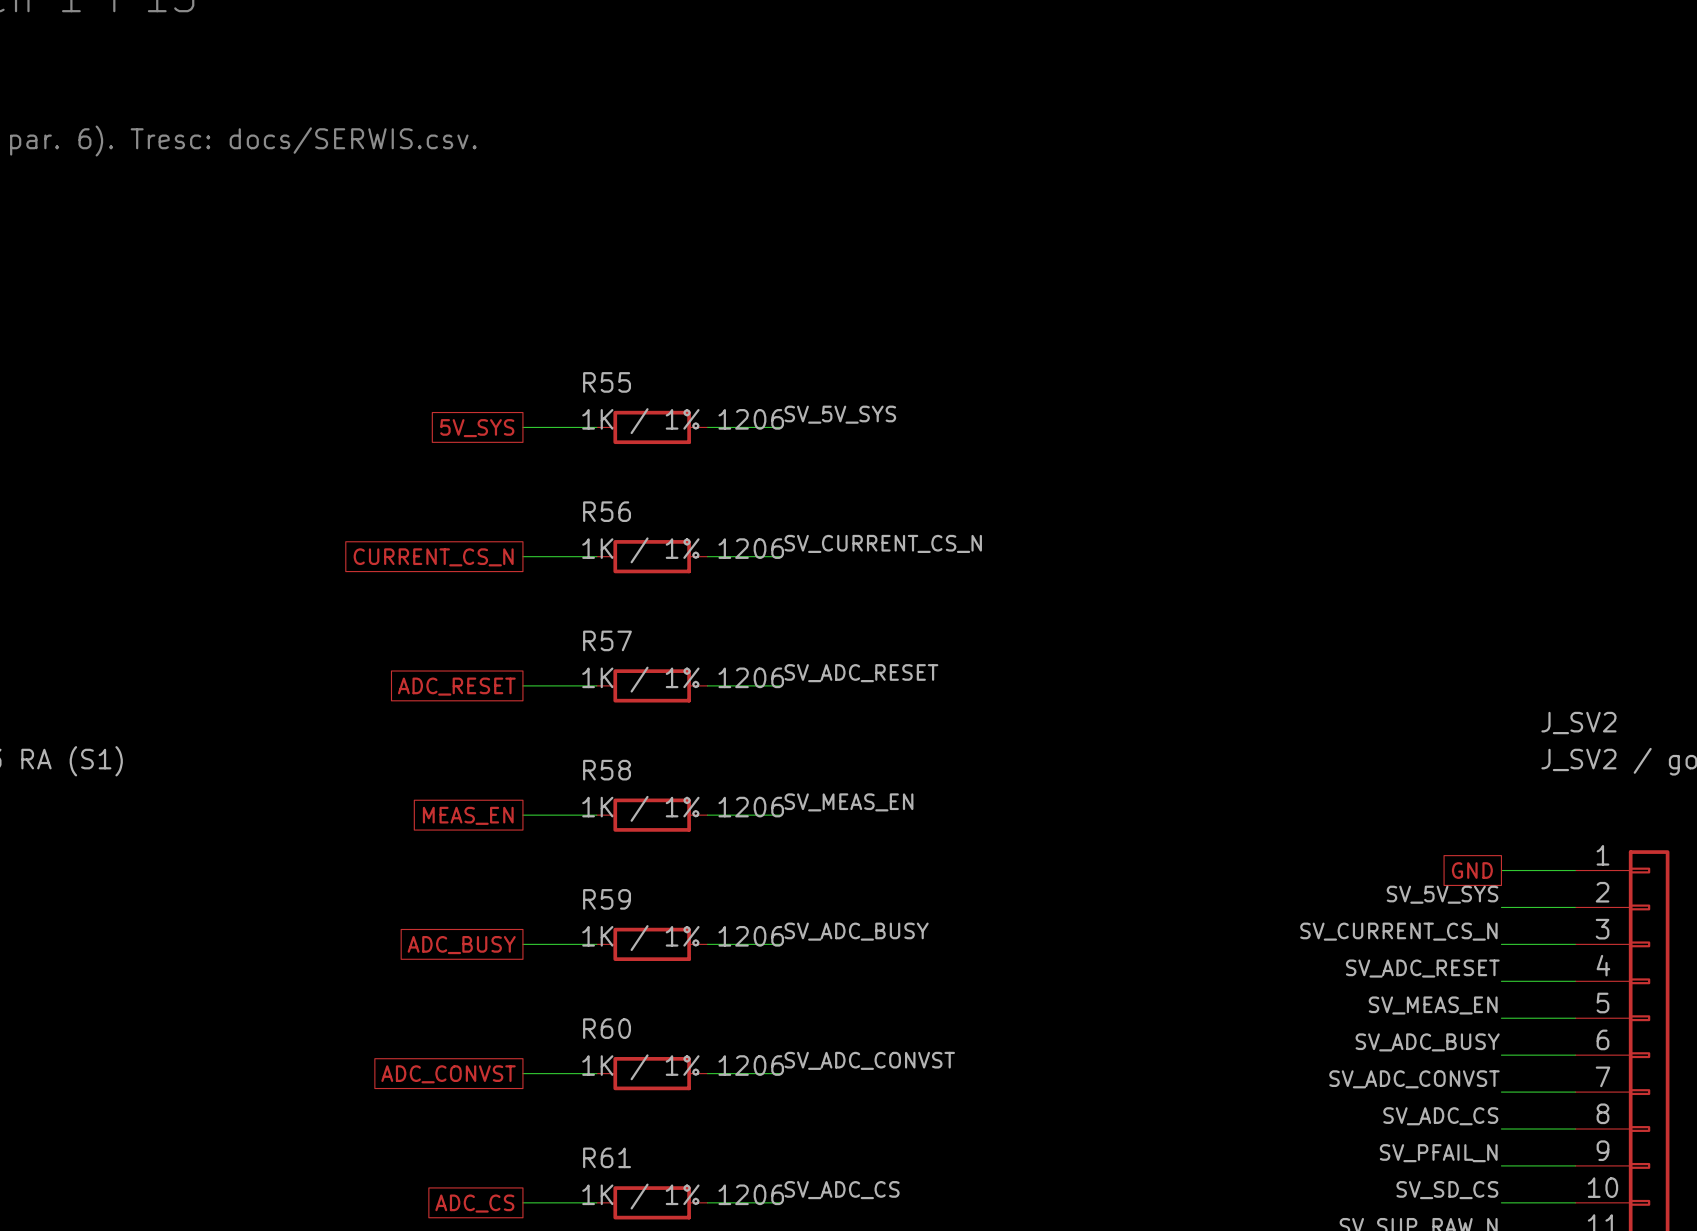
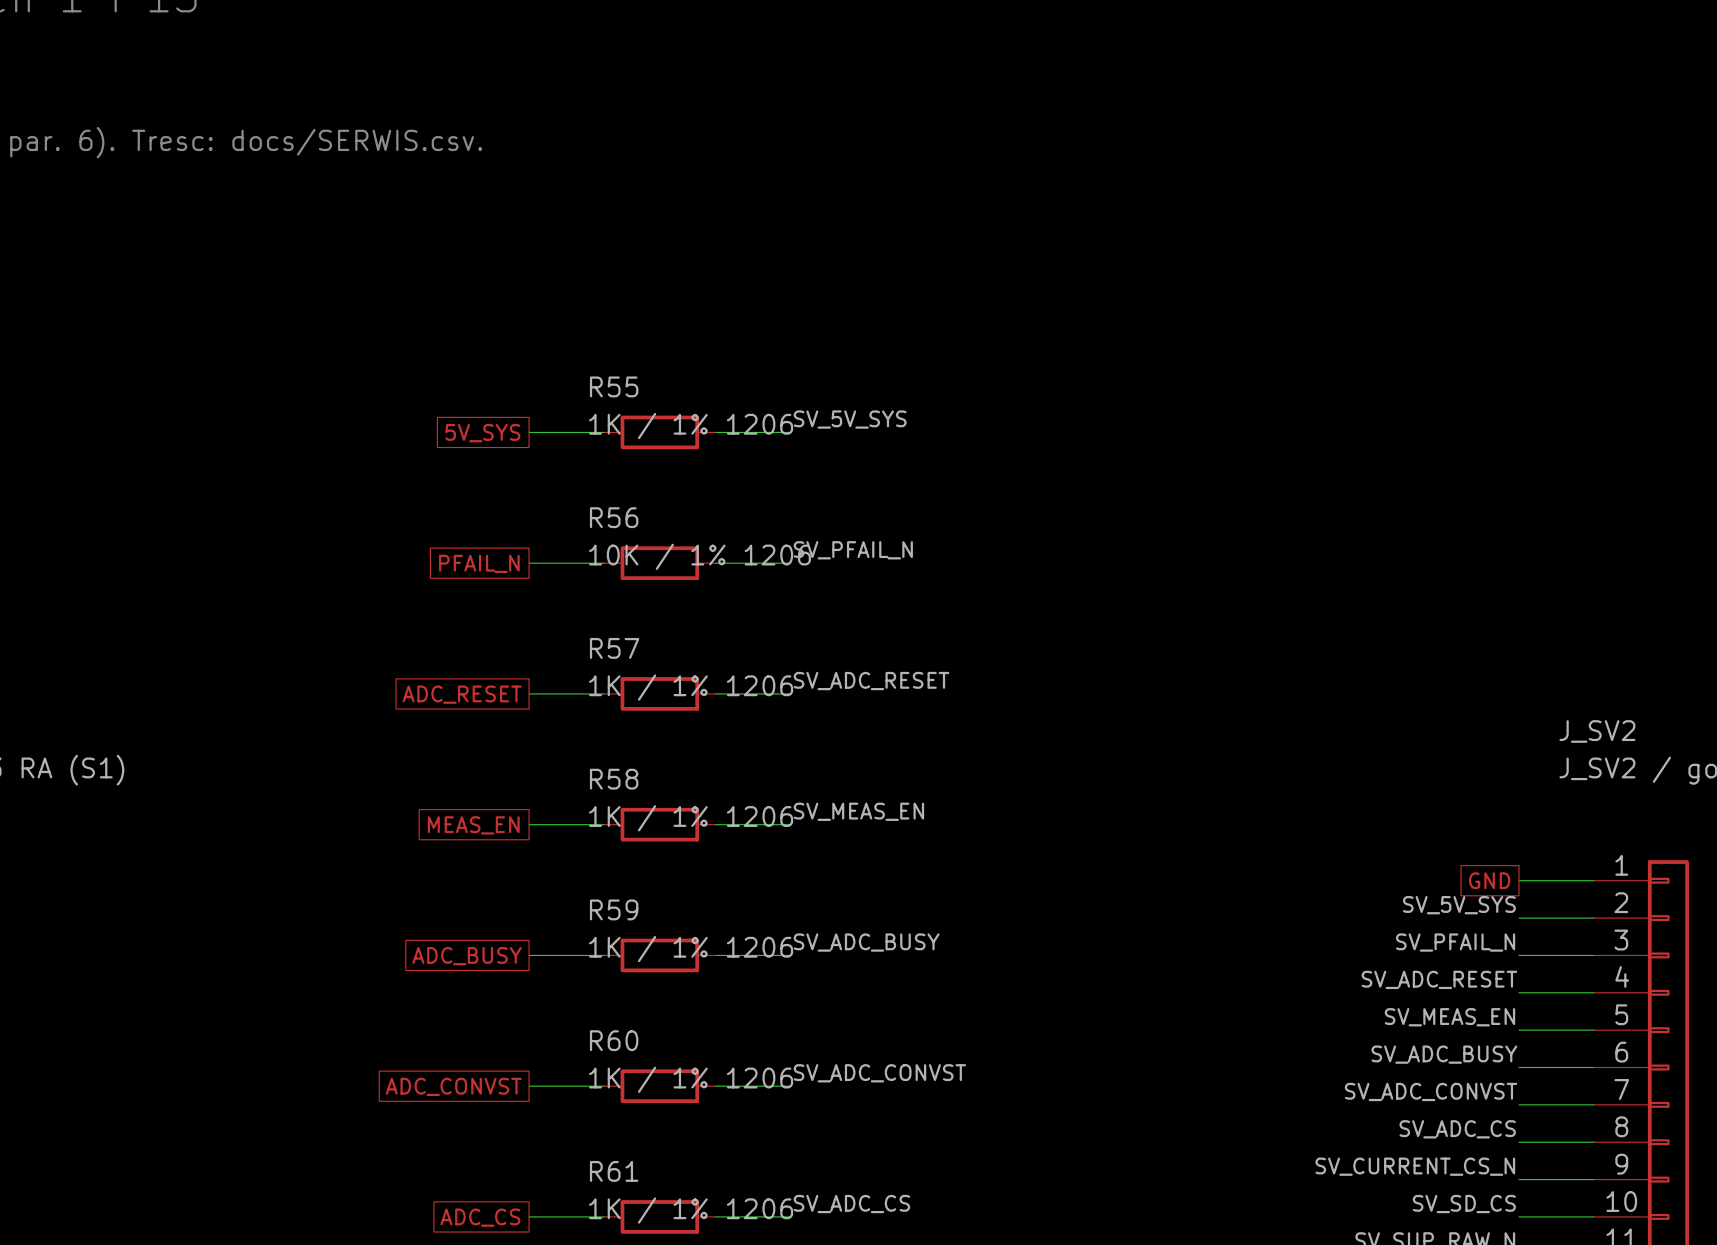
label: SV_CURRENT_CS_N (883, 543) -> SV_PFAIL_N (853, 550)
R56 value: 1K / 1% 1206 (683, 550) -> 10K / 1% 1206 (699, 556)
global label: CURRENT_CS_N (433, 557) -> PFAIL_N (479, 563)
label: SV_CURRENT_CS_N (1398, 931) -> SV_PFAIL_N (1455, 942)
label: SV_PFAIL_N (1438, 1153) -> SV_CURRENT_CS_N (1415, 1166)

